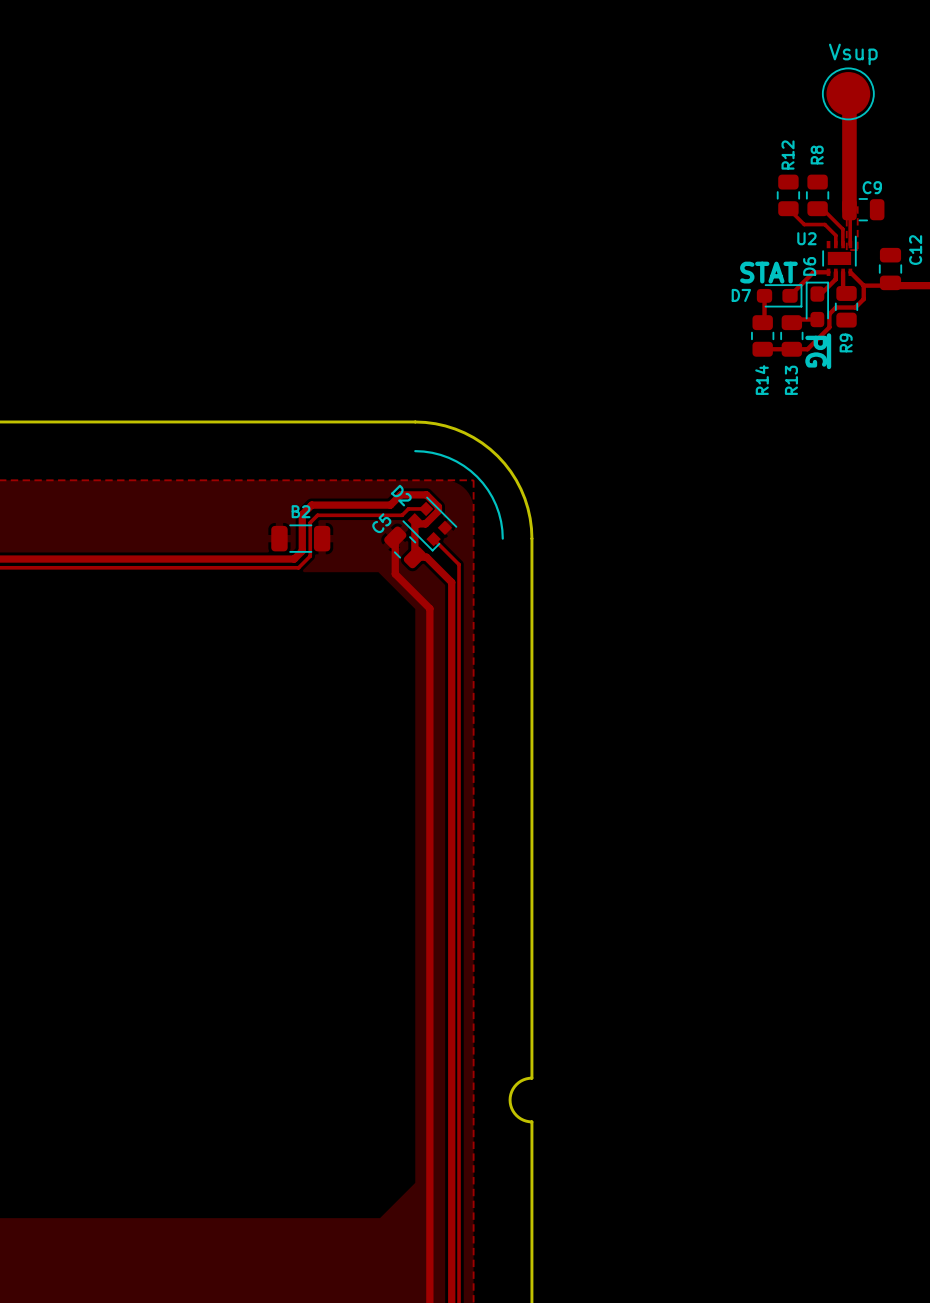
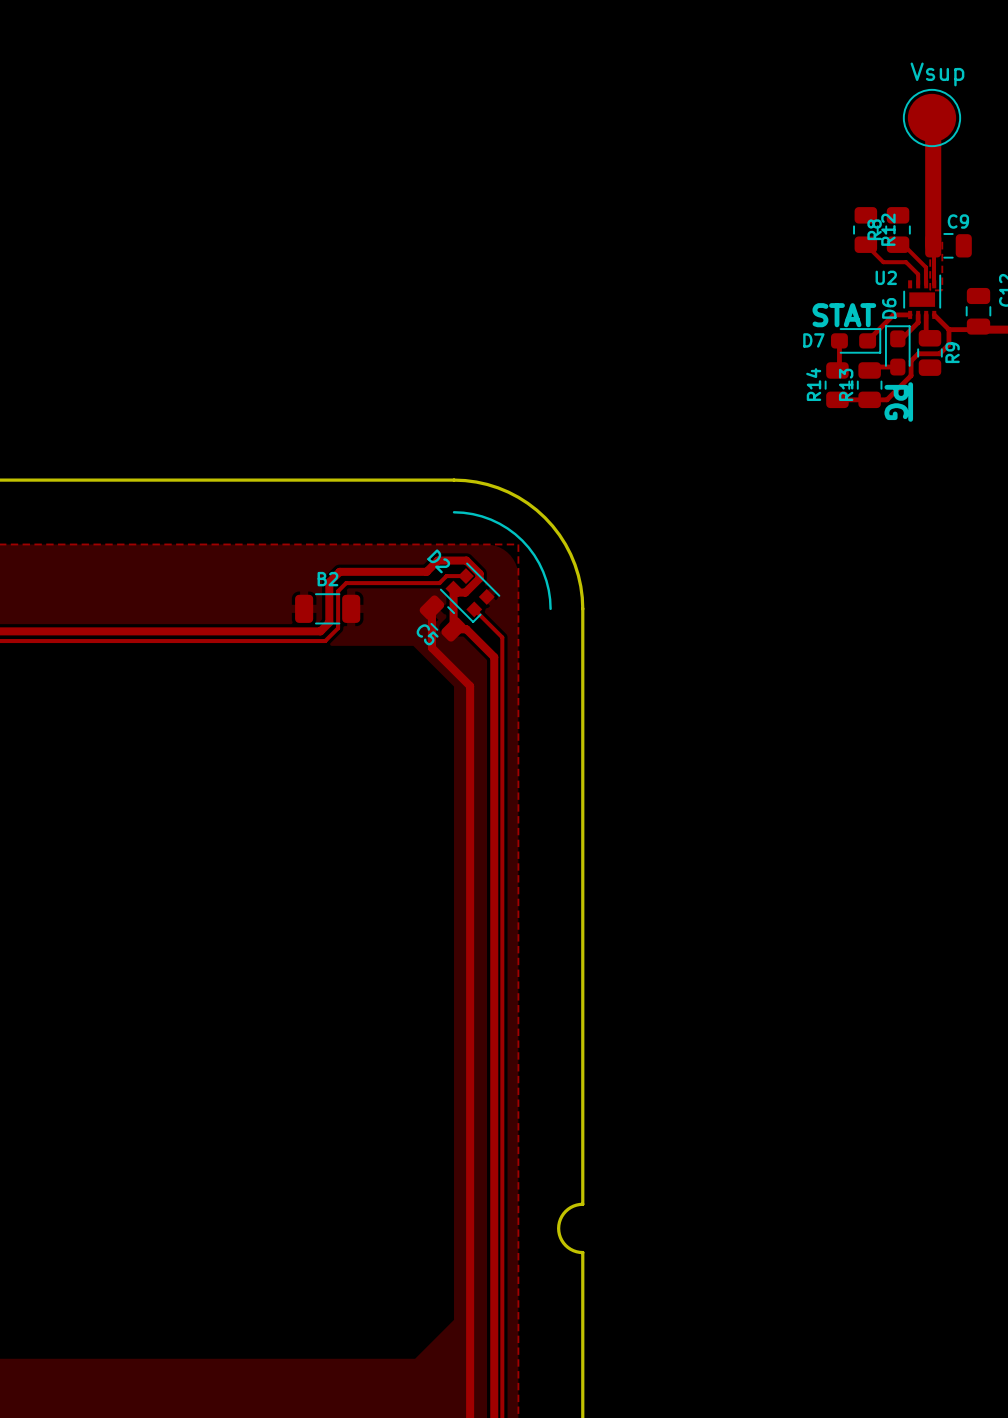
R12 name position: R12 (788, 155) -> R12 (888, 229)
R8 name position: R8 (817, 155) -> R8 (874, 229)
R9 name position: R9 (846, 342) -> R9 (952, 352)
R14 name position: R14 (762, 380) -> R14 (813, 384)
R13 name position: R13 (791, 380) -> R13 (846, 384)
C5 name rotation: 0° (381, 523) -> 90° clockwise (427, 634)
C5 name position: C5 (381, 523) -> C5 (427, 634)

